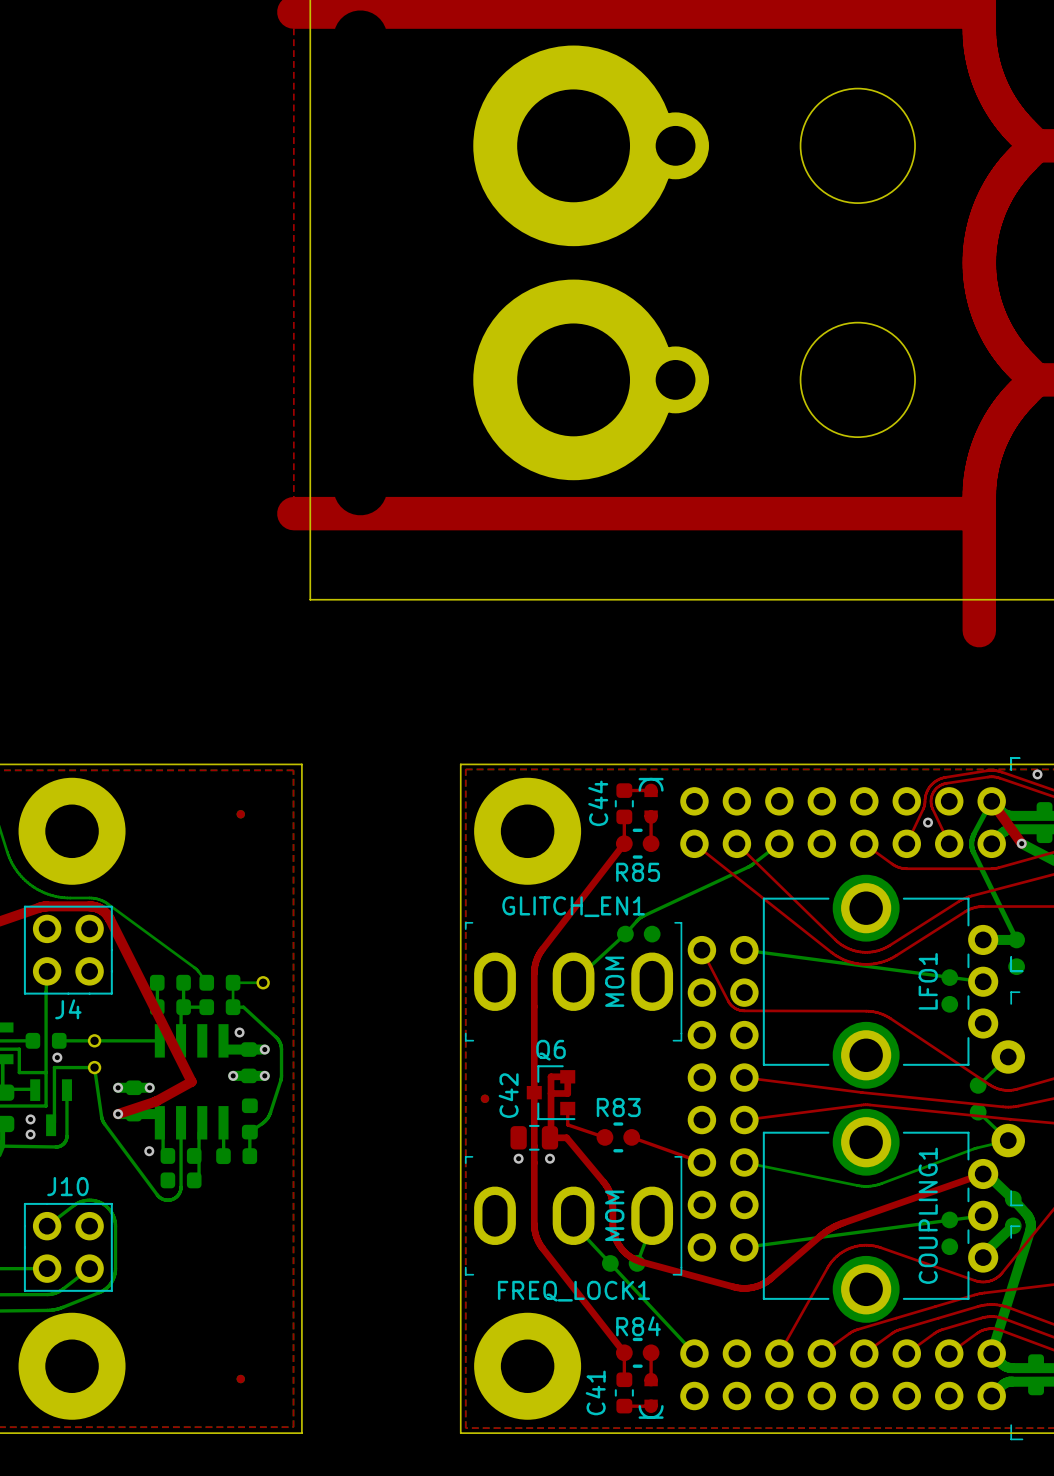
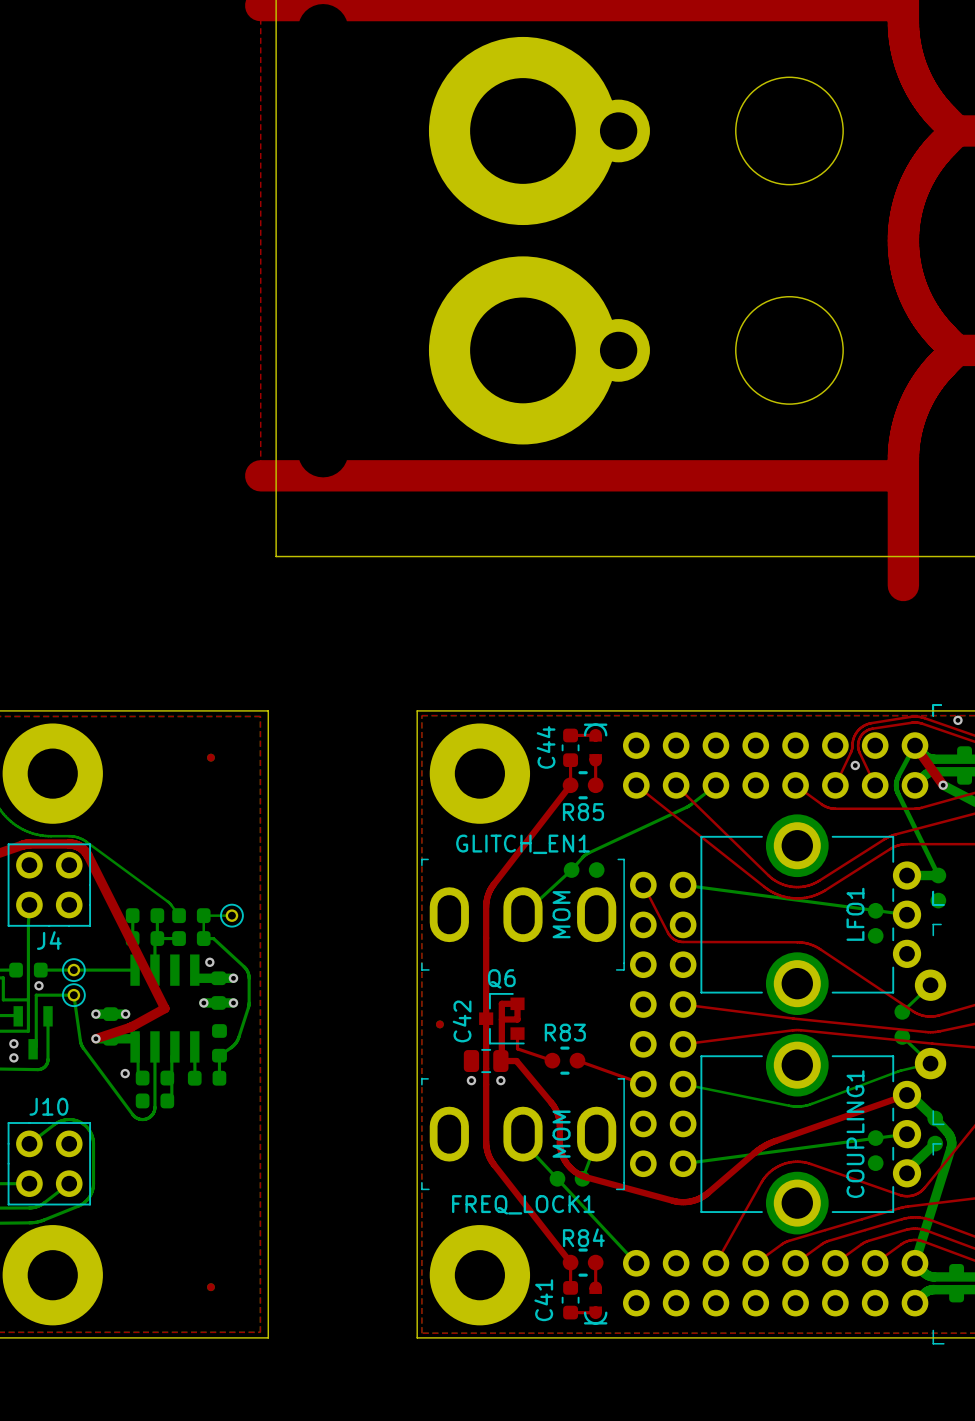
part footprint: [256, 976, 270, 990] -> [220, 903, 244, 928]
part footprint: [87, 1034, 102, 1048] -> [61, 958, 86, 983]
part footprint: [87, 1060, 102, 1075] -> [61, 983, 86, 1008]

